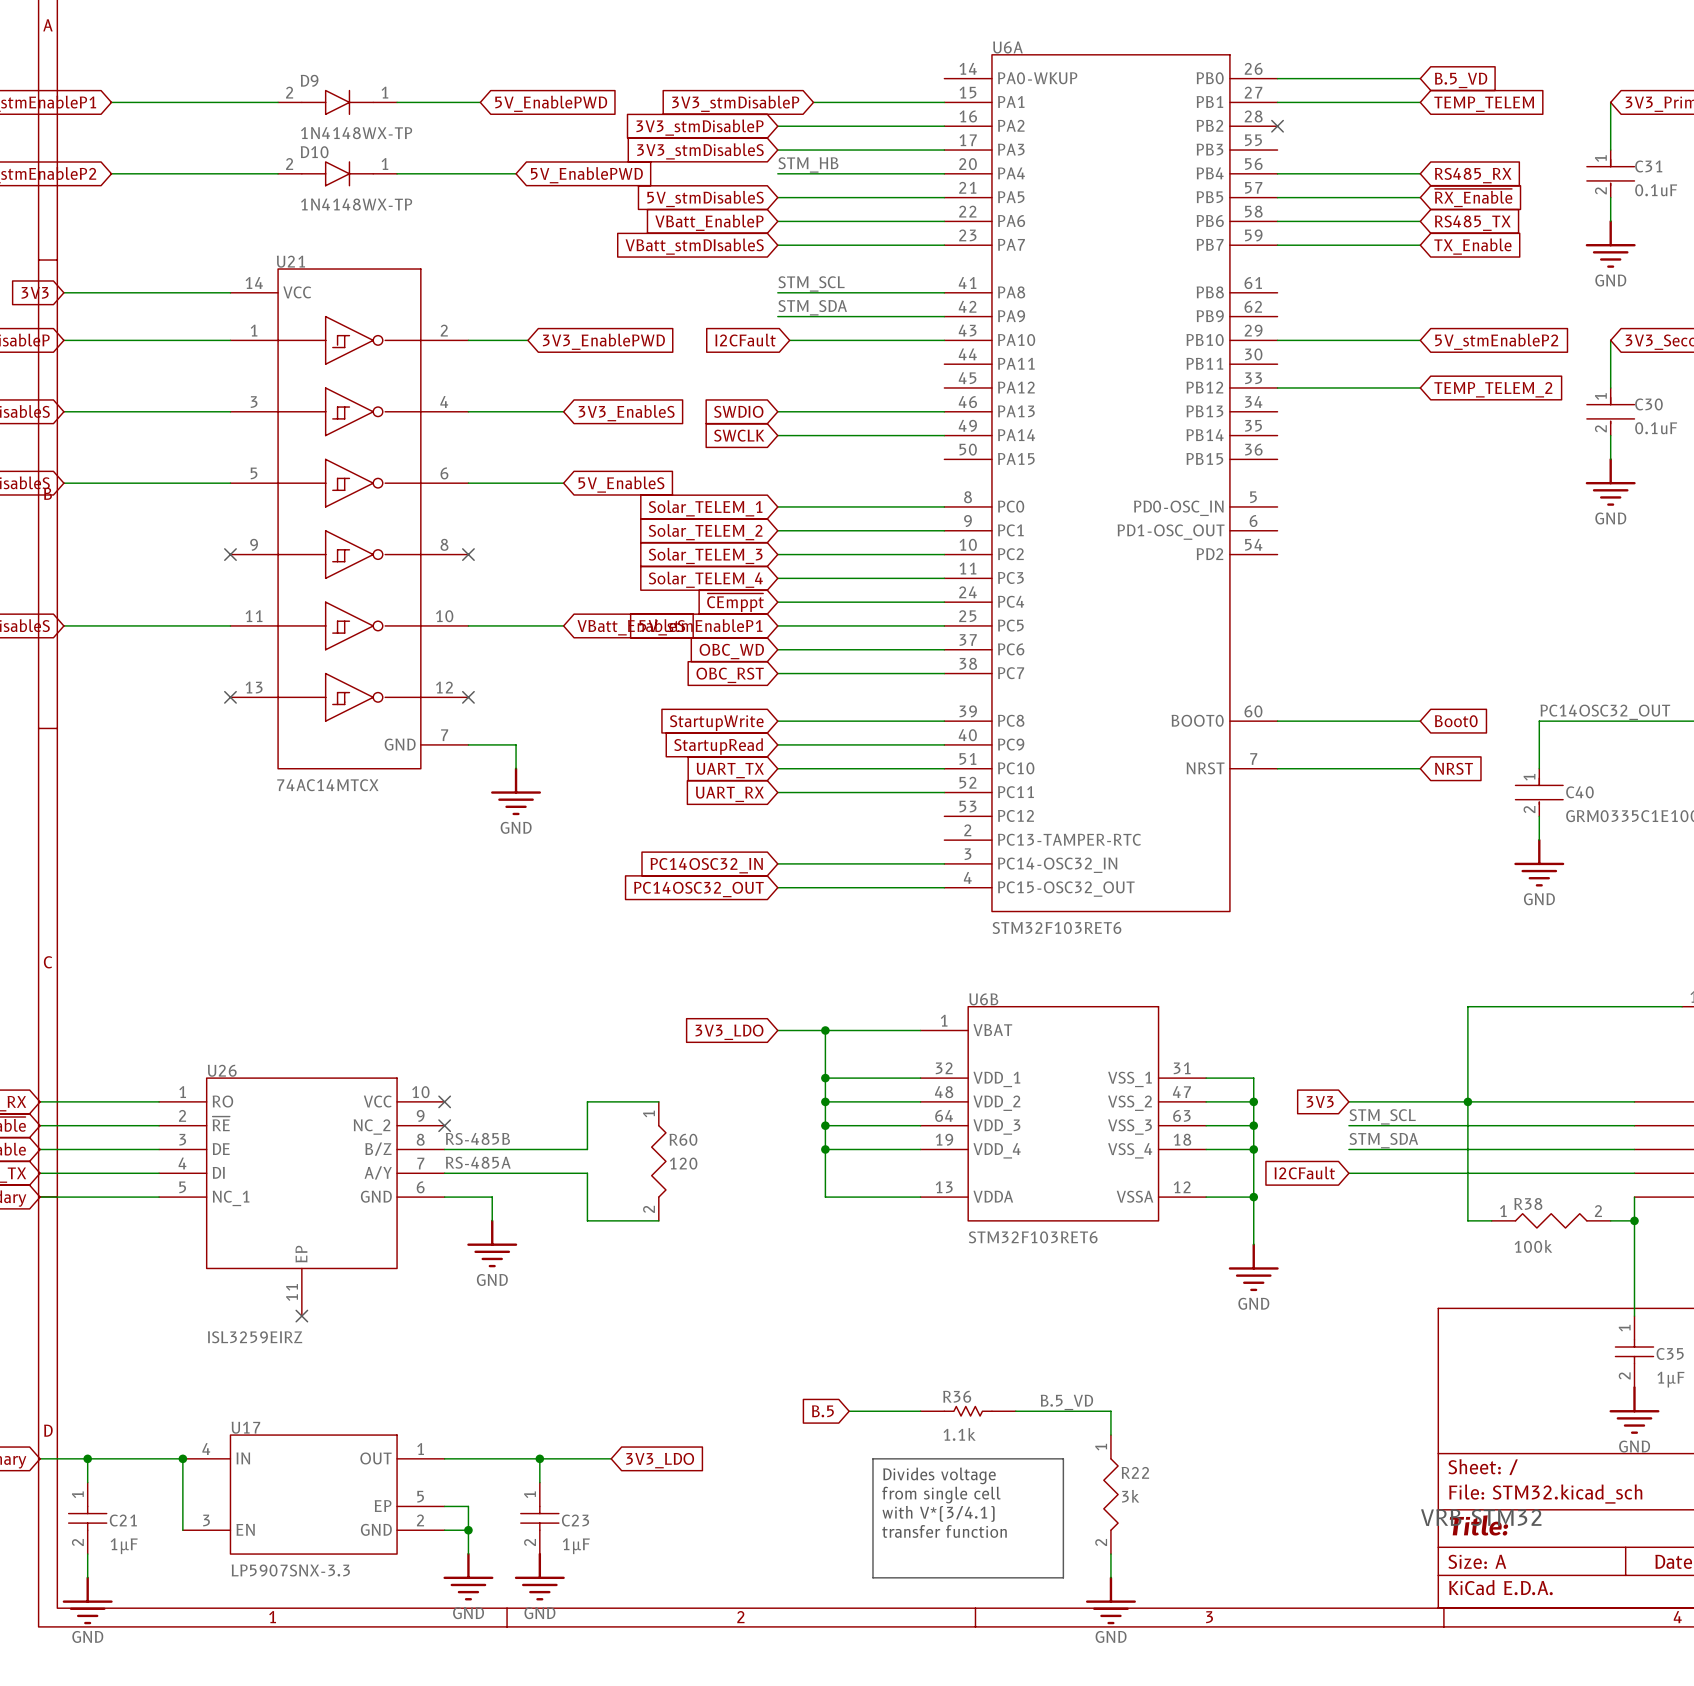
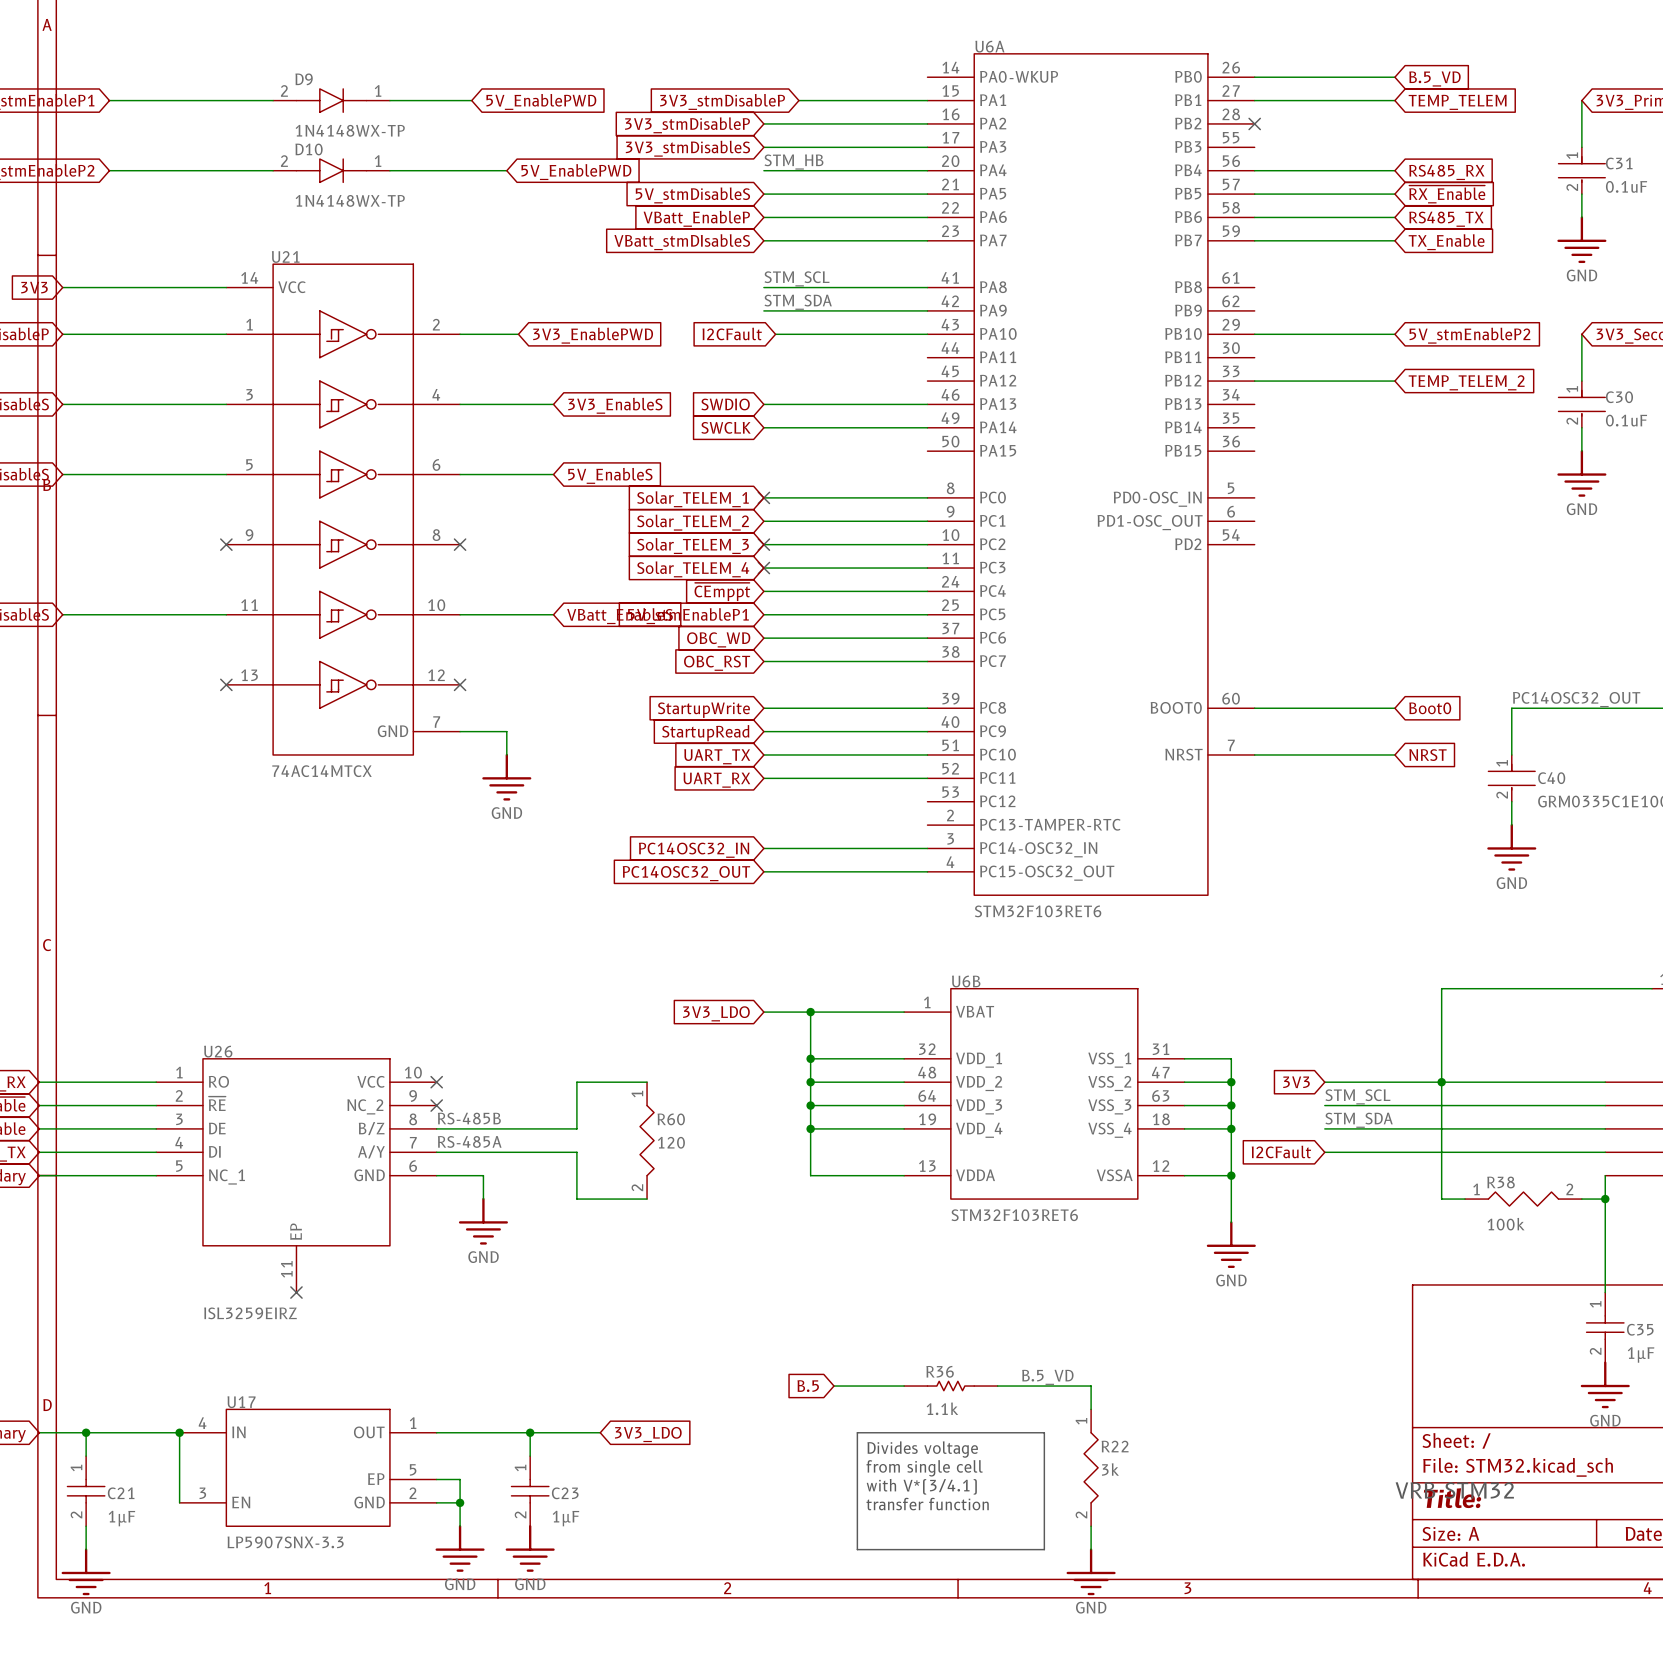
no-connect mark: none -> (763, 497)
no-connect mark: none -> (763, 544)
no-connect mark: none -> (763, 568)

